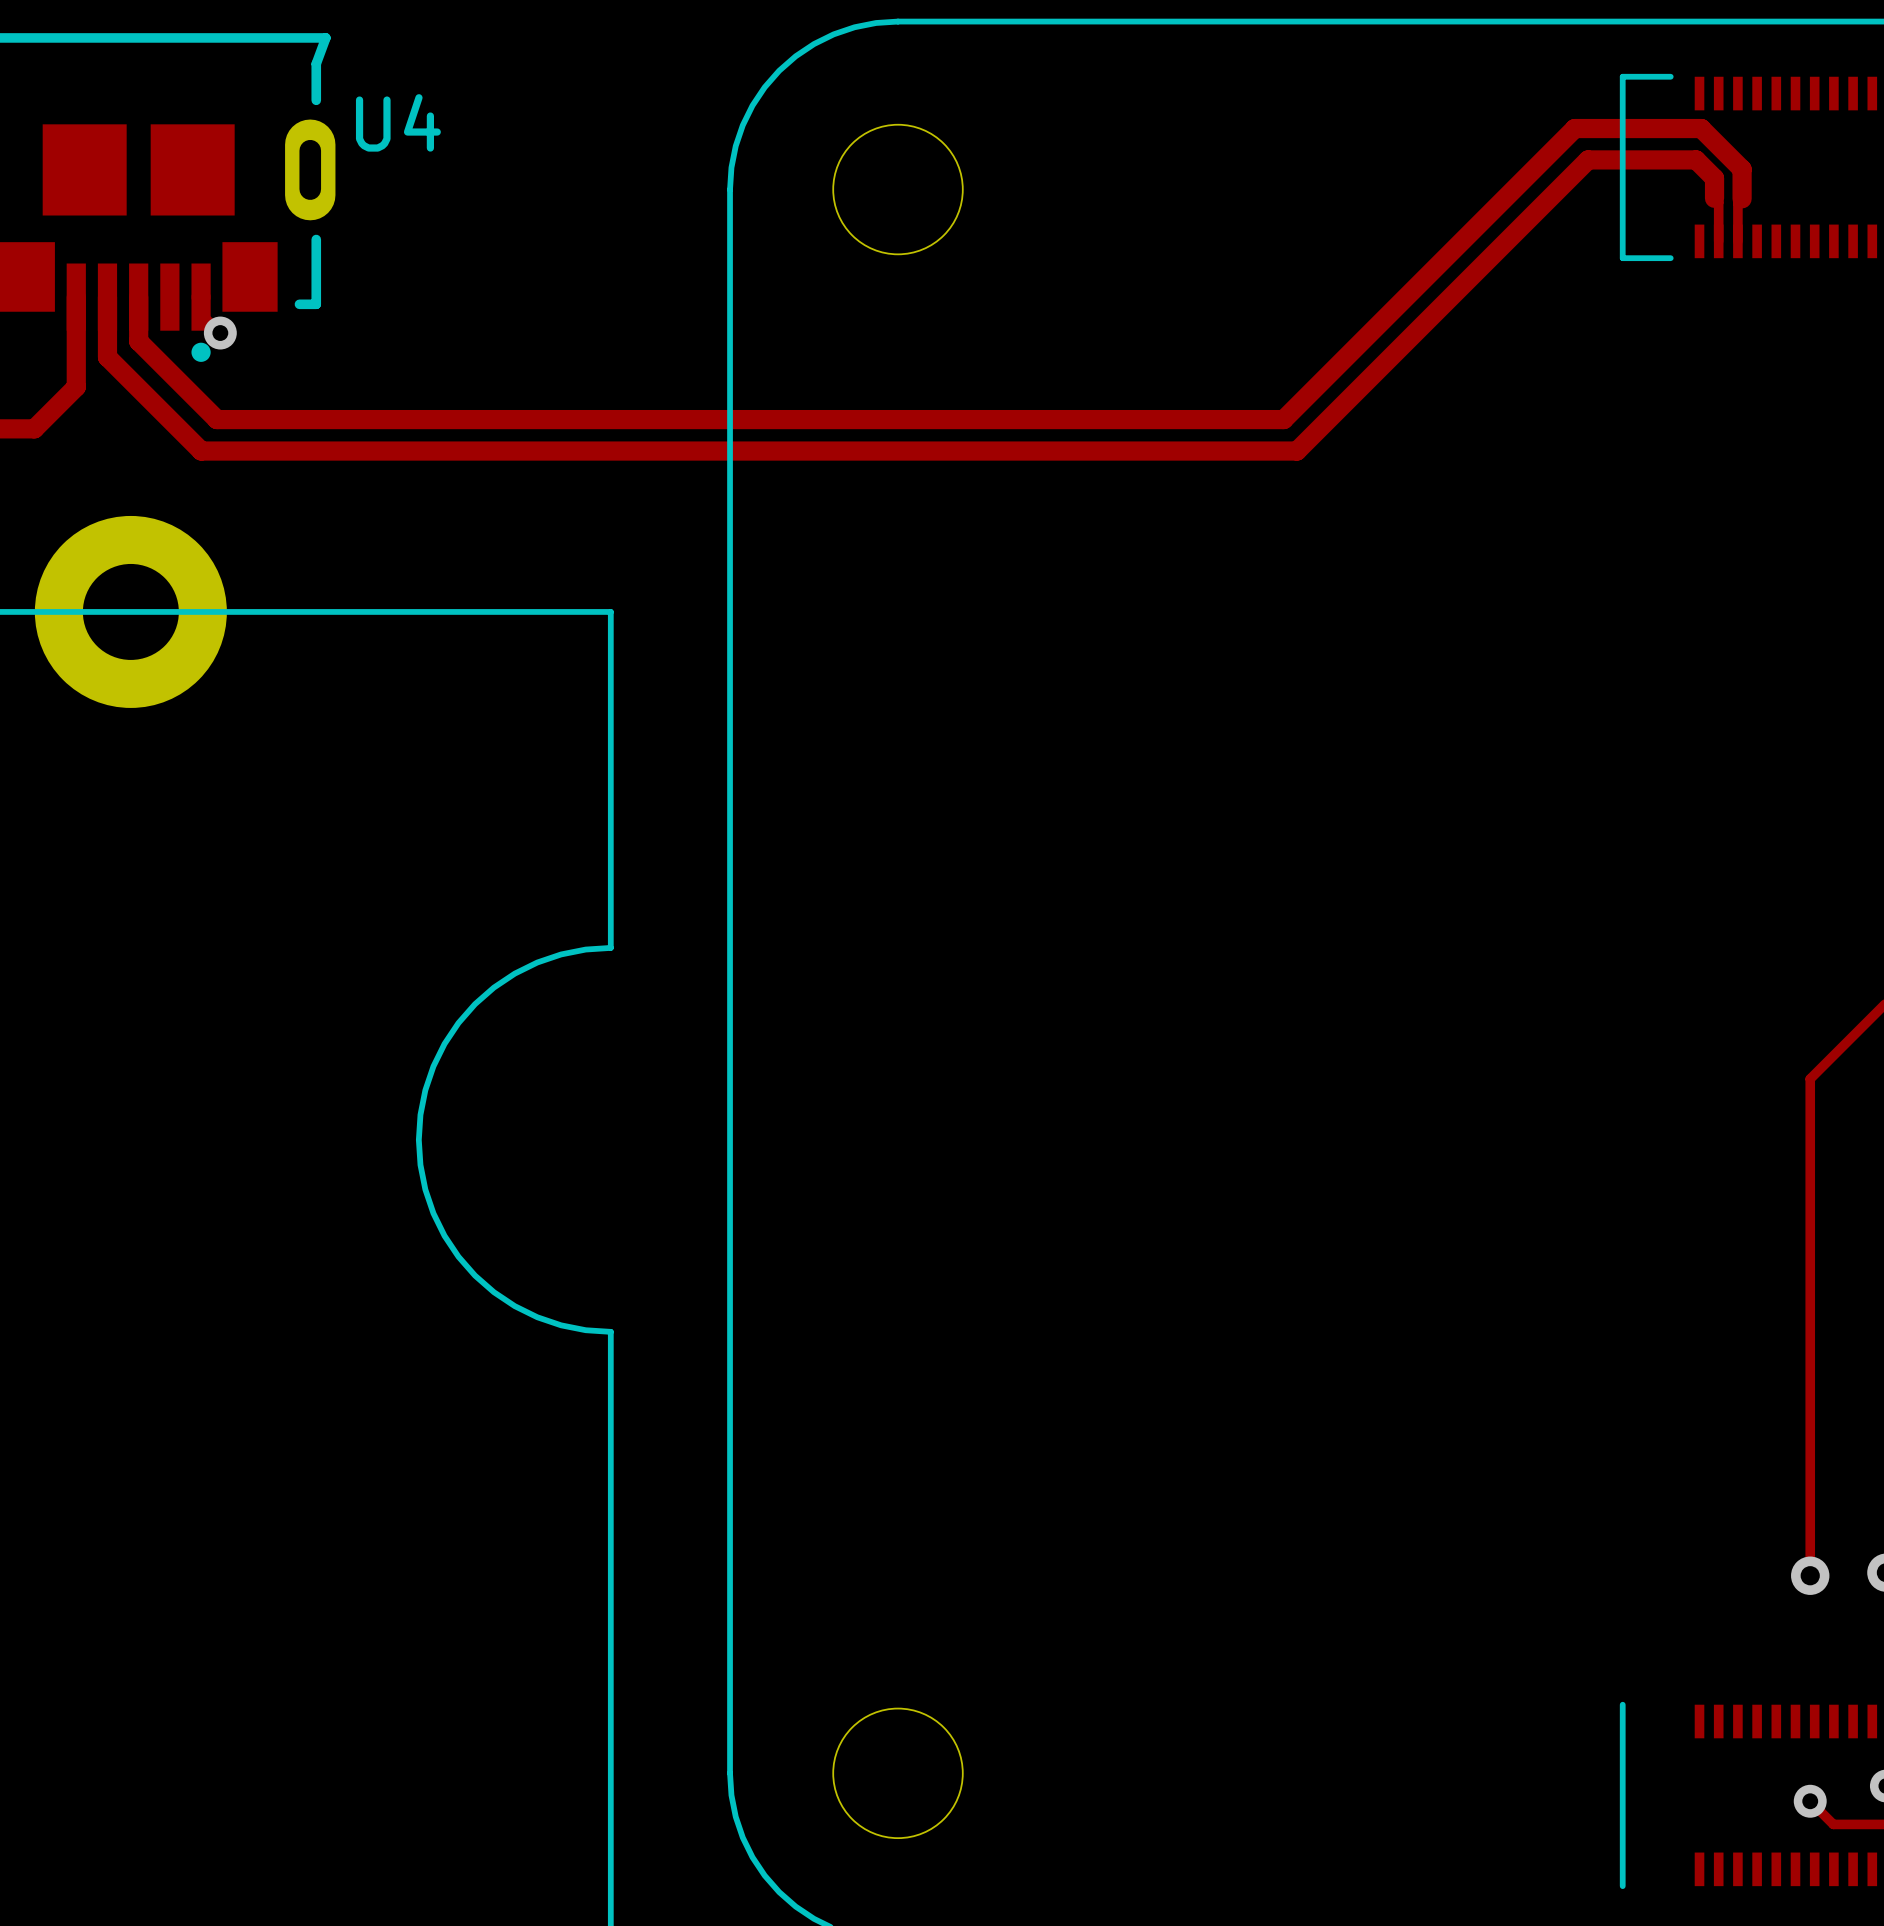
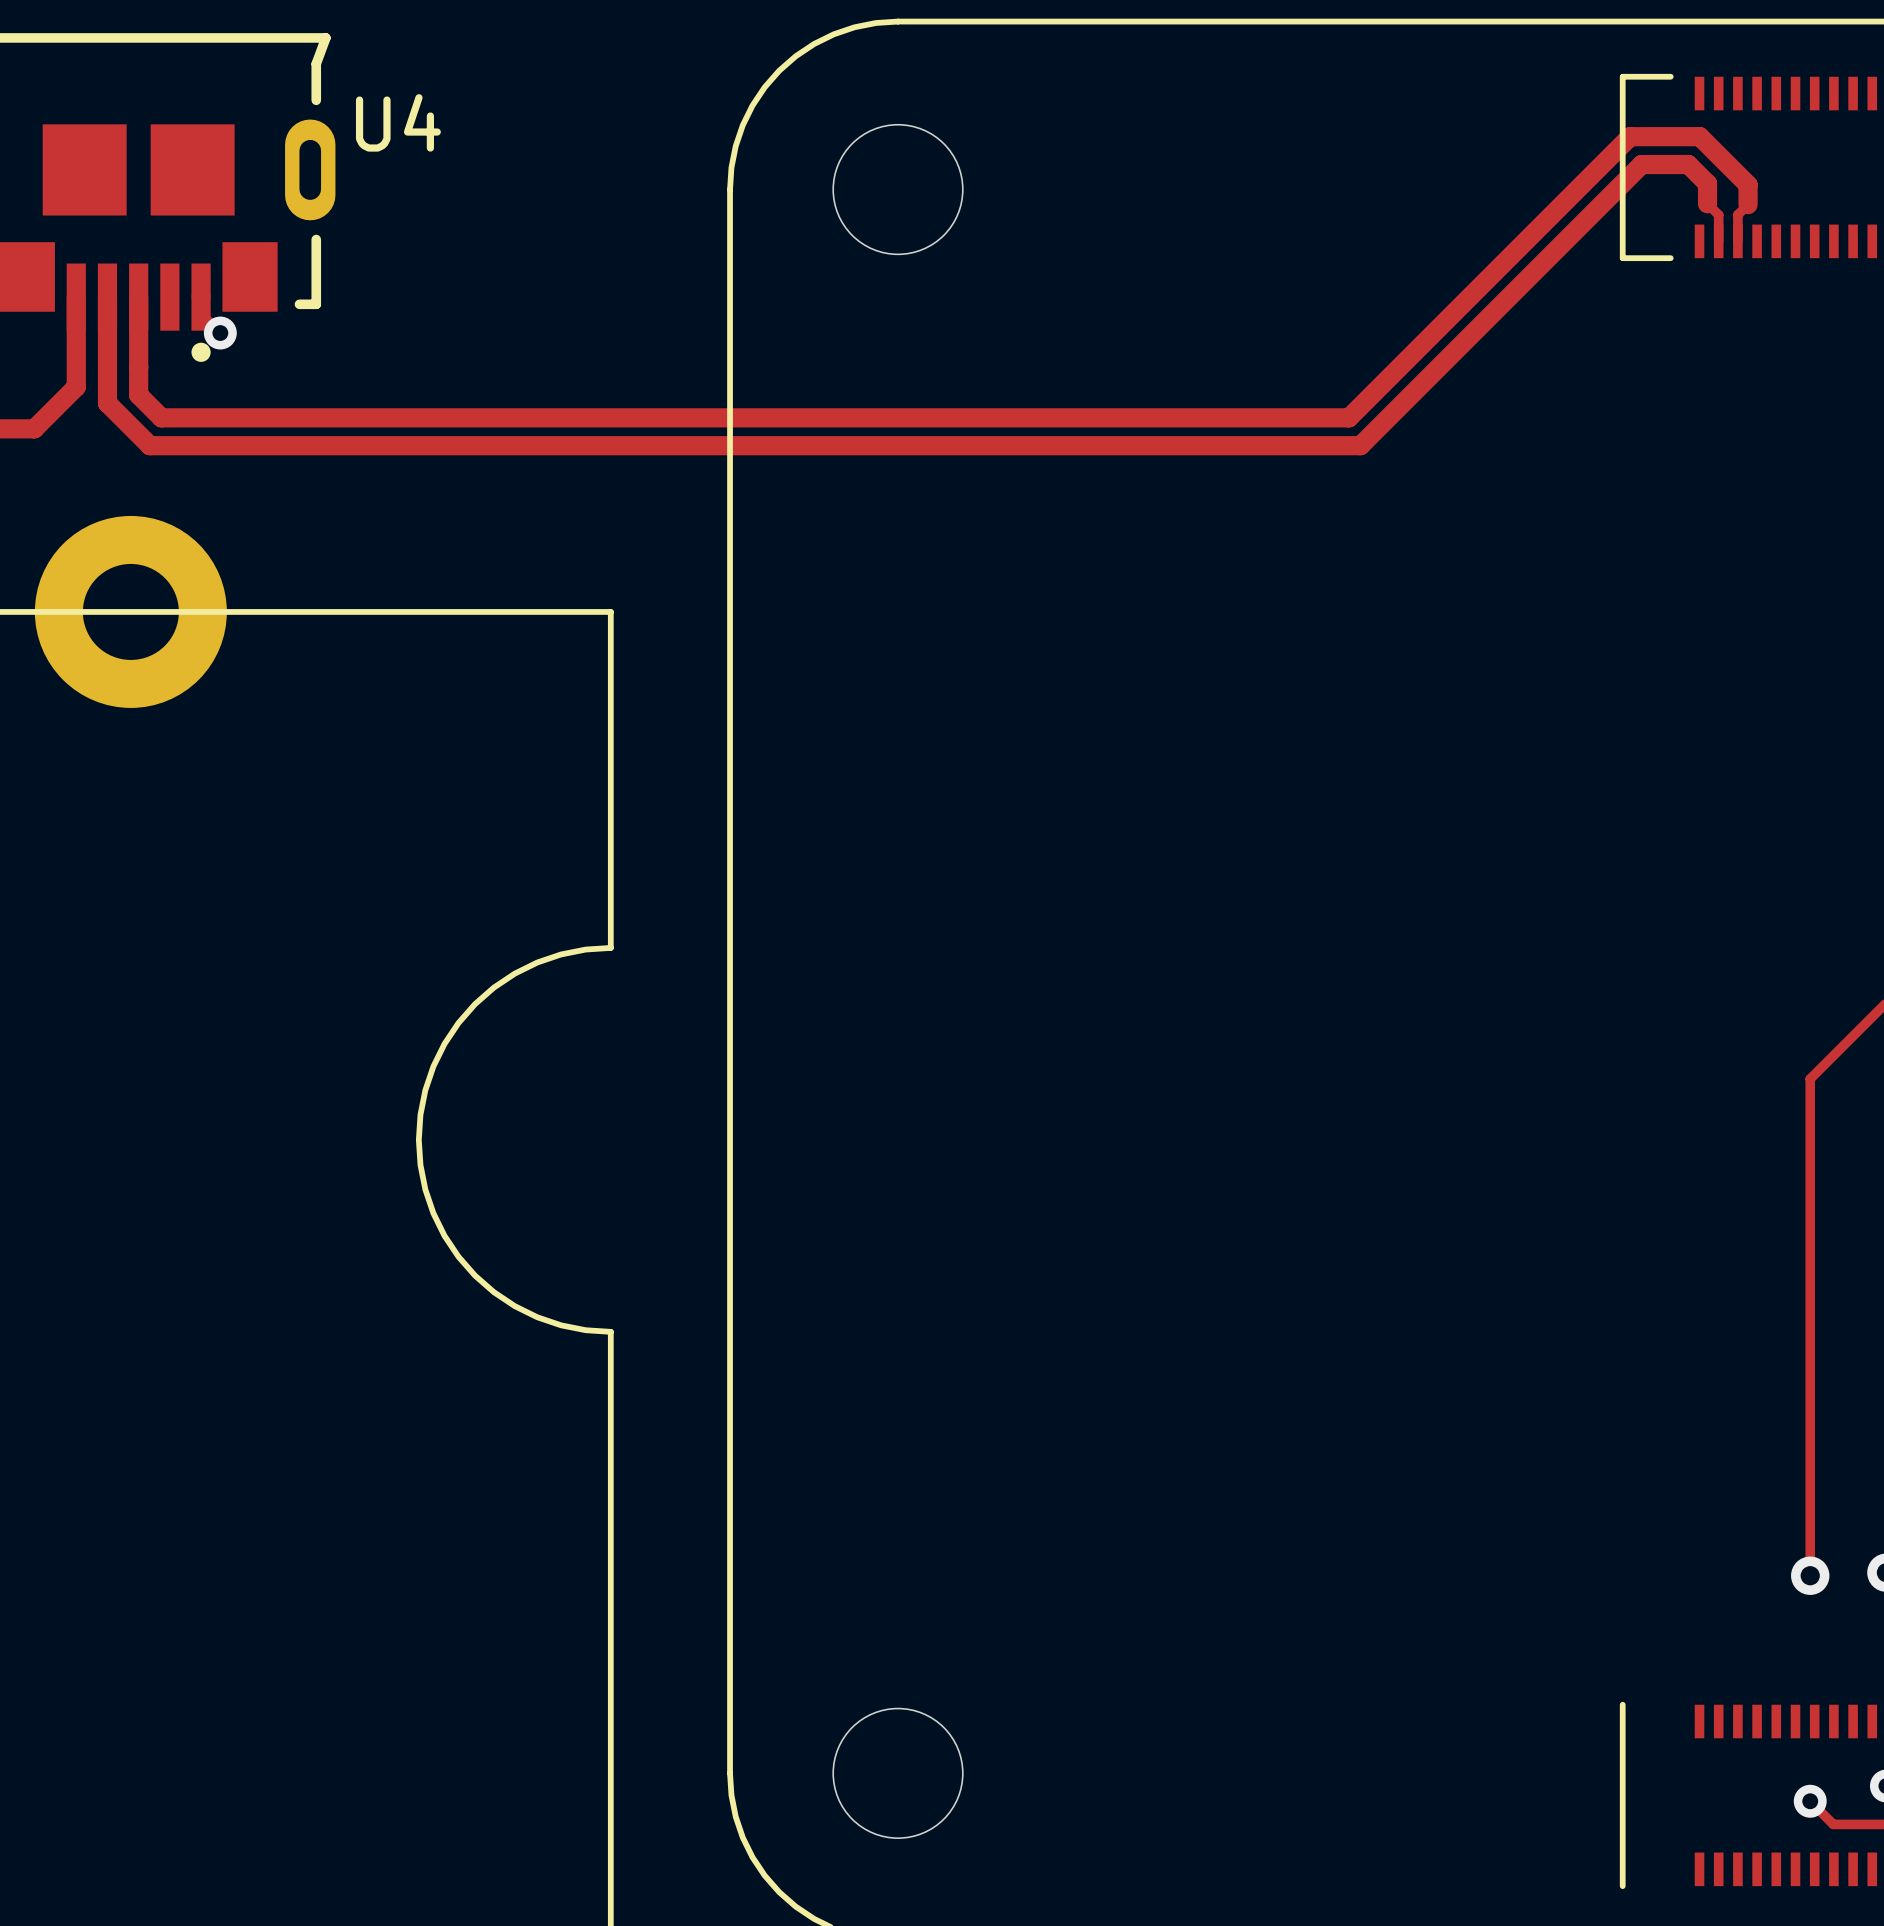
track: (1718, 214) (1718, 202) (1714, 198) (1714, 178) (1696, 159) (1588, 159) (1297, 451) (201, 451) (107, 357) -> (1718, 214) (1707, 203) (1707, 183) (1688, 164) (1641, 164) (1360, 445) (149, 445) (107, 403) (107, 357)
track: (1737, 214) (1737, 202) (1742, 198) (1742, 169) (1701, 128) (1574, 128) (1283, 419) (216, 419) (138, 341) -> (1737, 214) (1748, 204) (1748, 184) (1699, 136) (1630, 136) (1349, 417) (161, 417) (138, 395) (138, 341)

